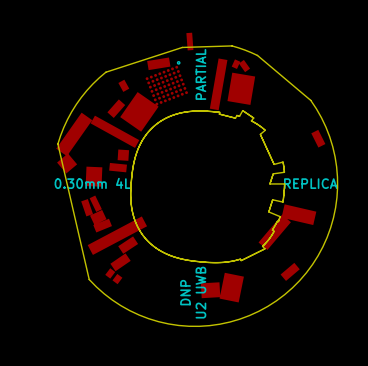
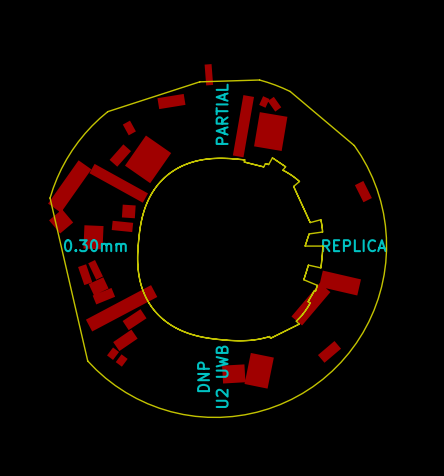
part: (166, 83) -> none
drawing shape: [54, 177, 132, 190] -> [63, 239, 127, 253]

